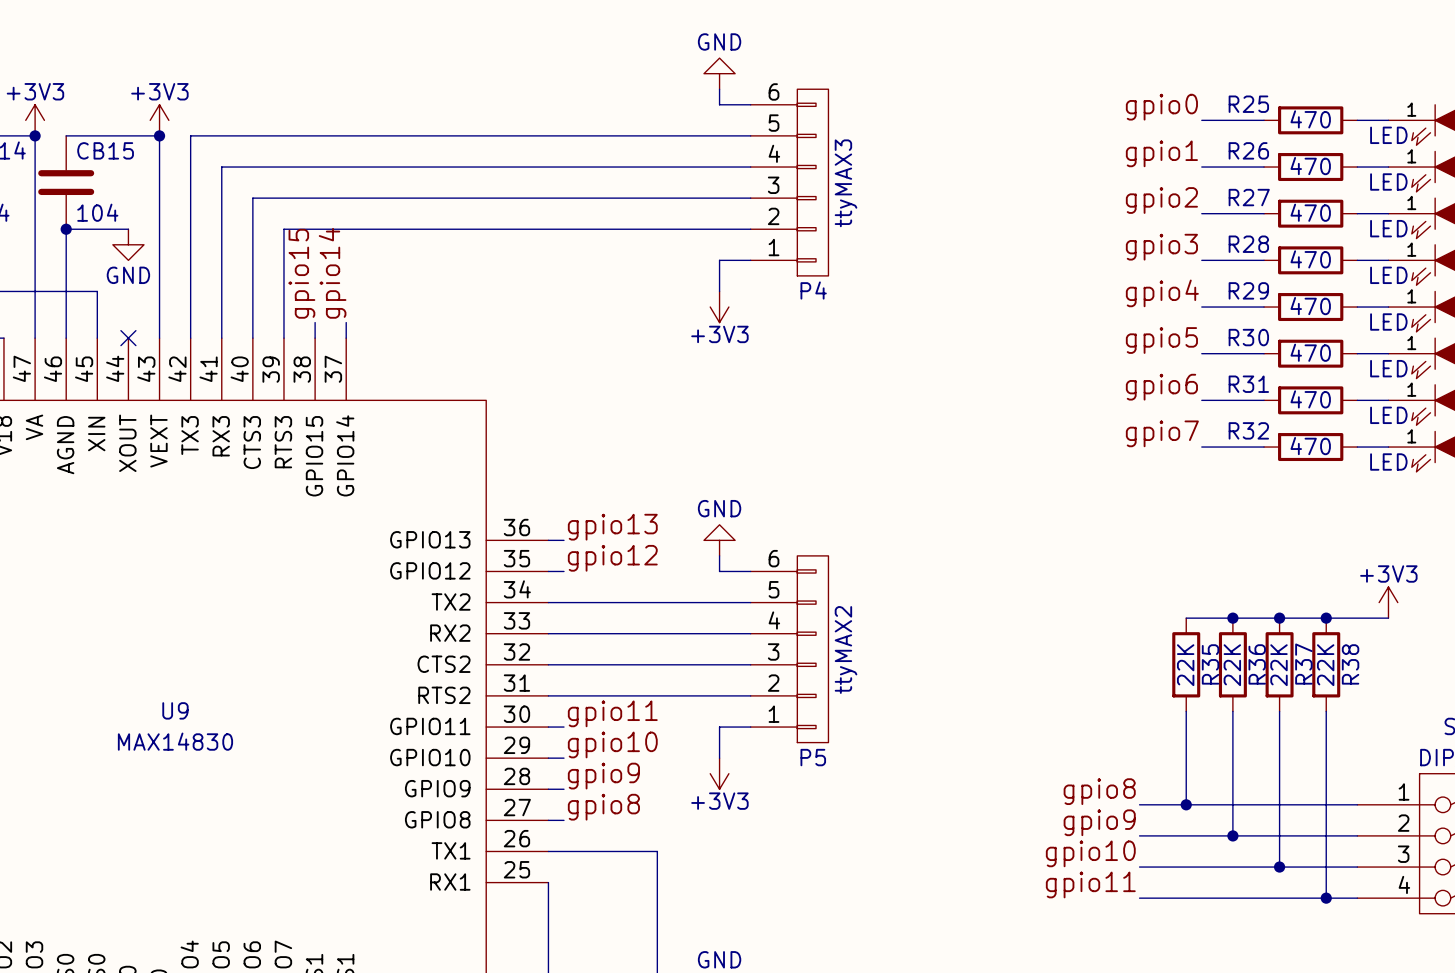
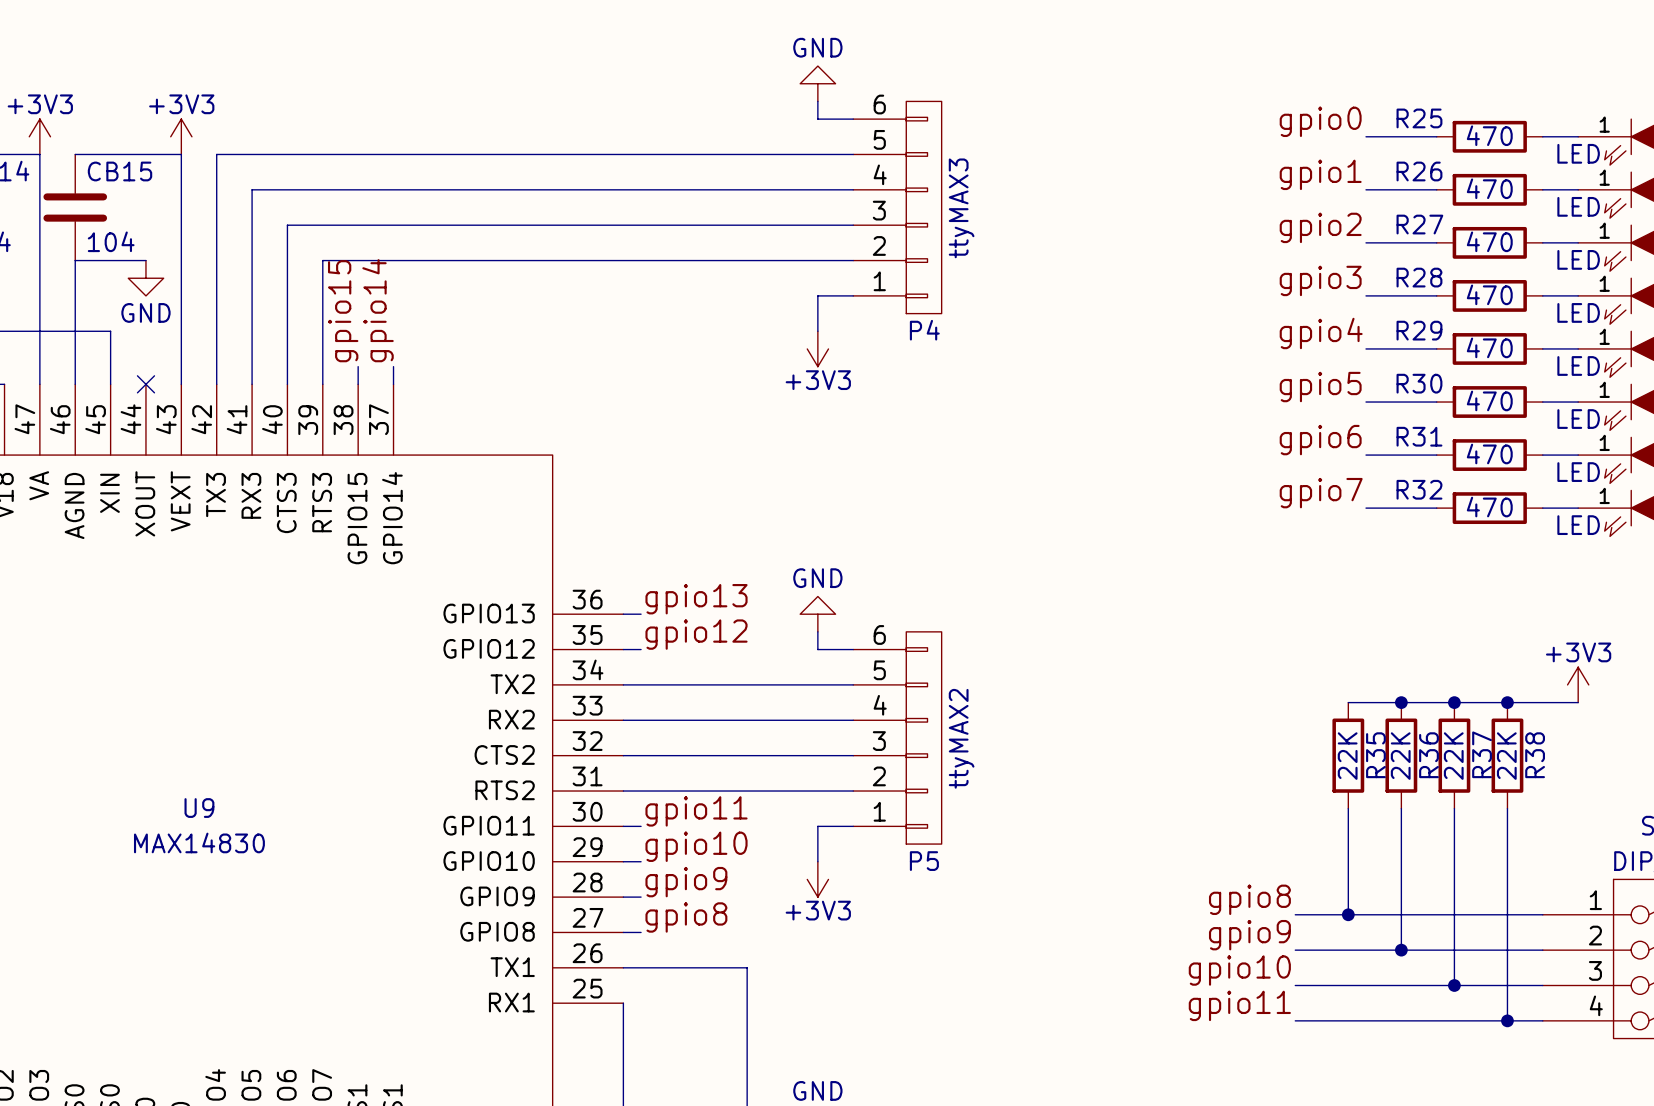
junction: (35, 135) -> none
junction: (159, 135) -> none
junction: (66, 229) -> none

